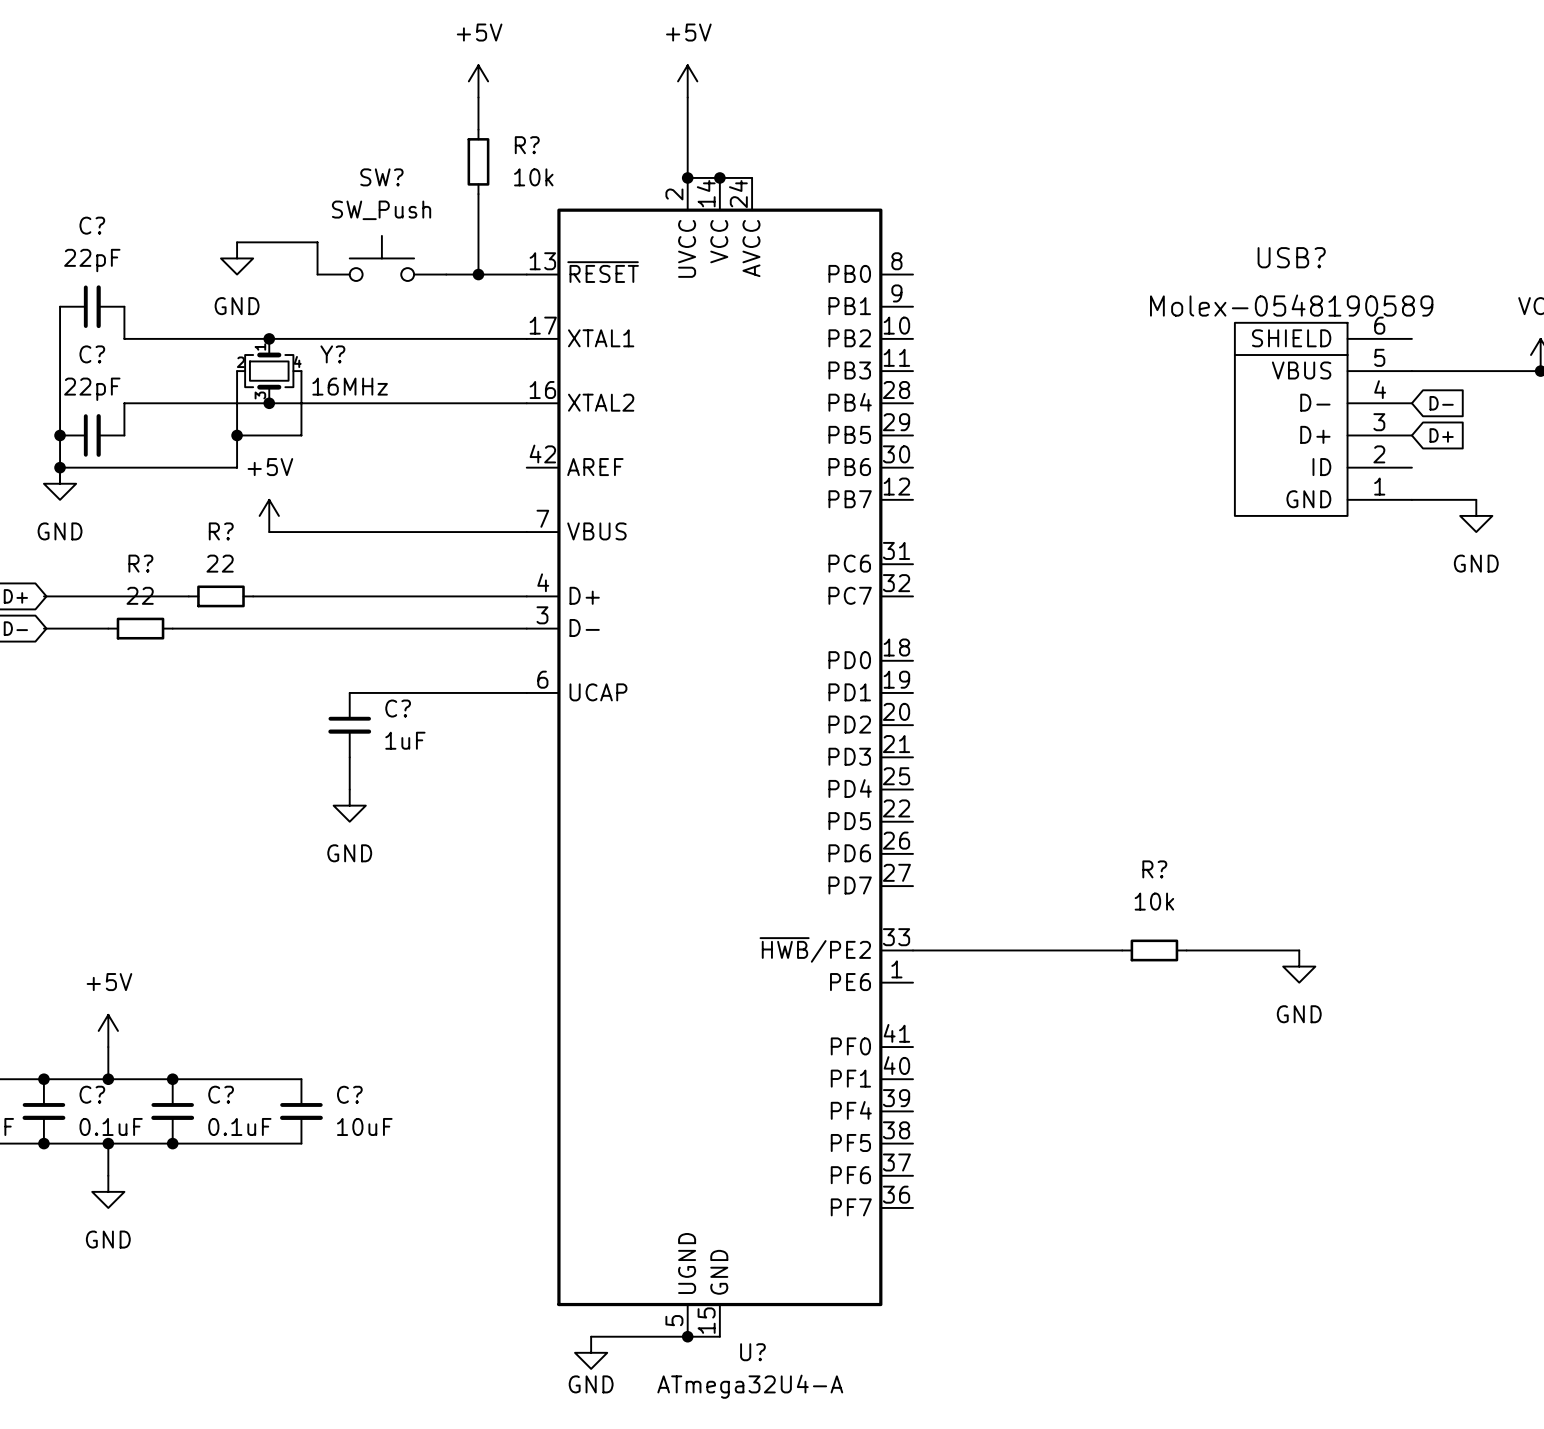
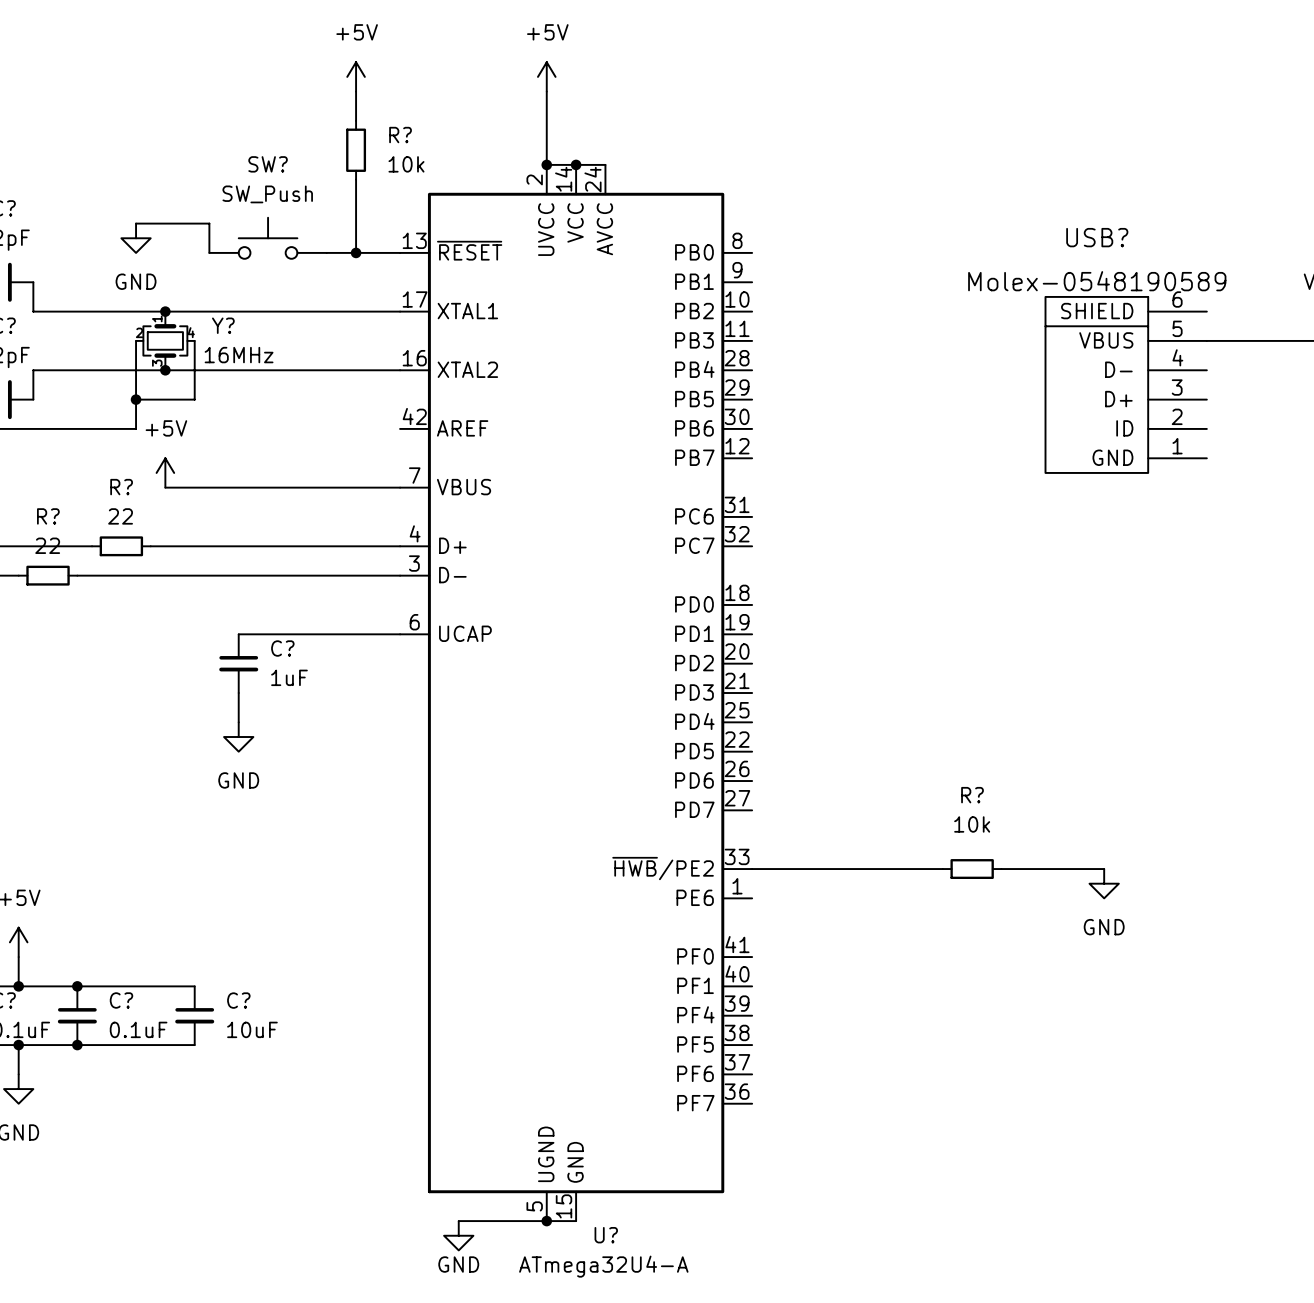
global label: D- (1441, 403) -> none
global label: D+ (1441, 435) -> none
wire: (1411, 499) (1476, 499) -> none
power symbol: GND (1476, 515) -> none

